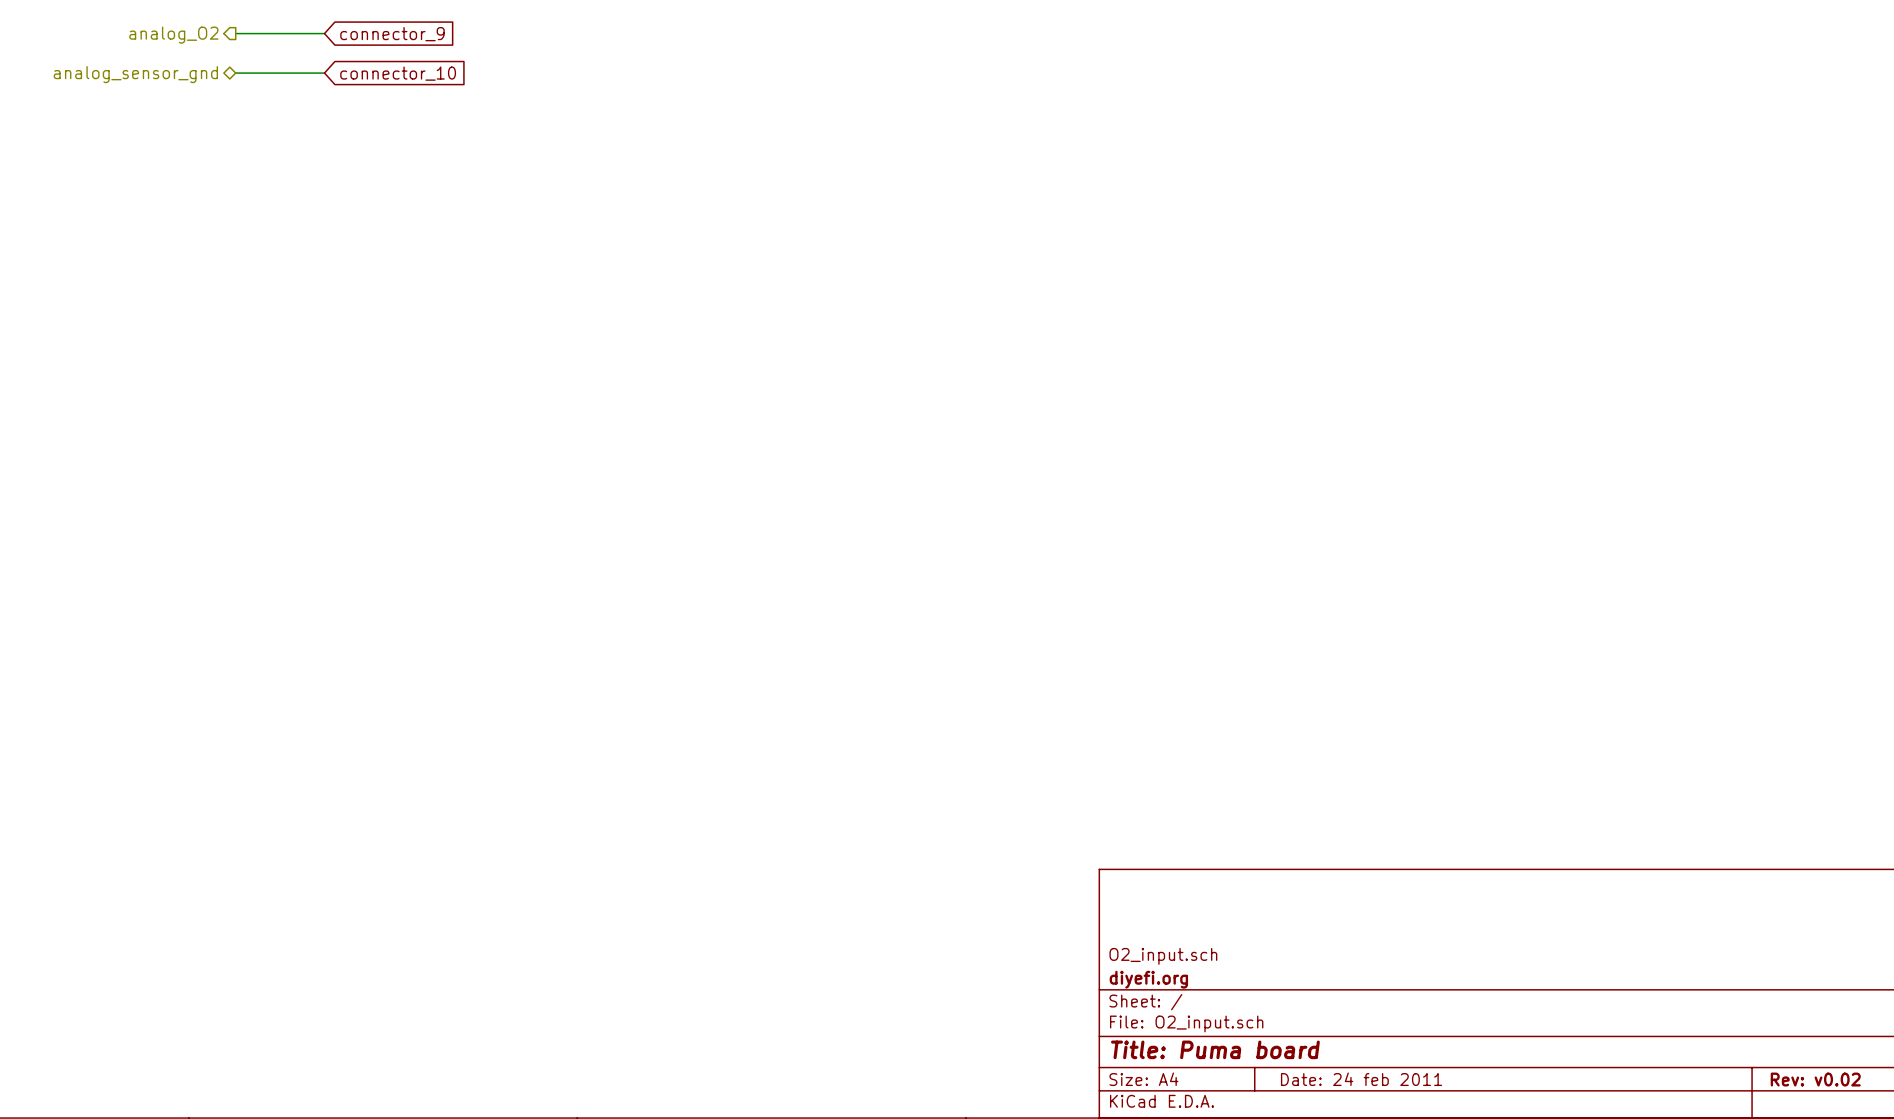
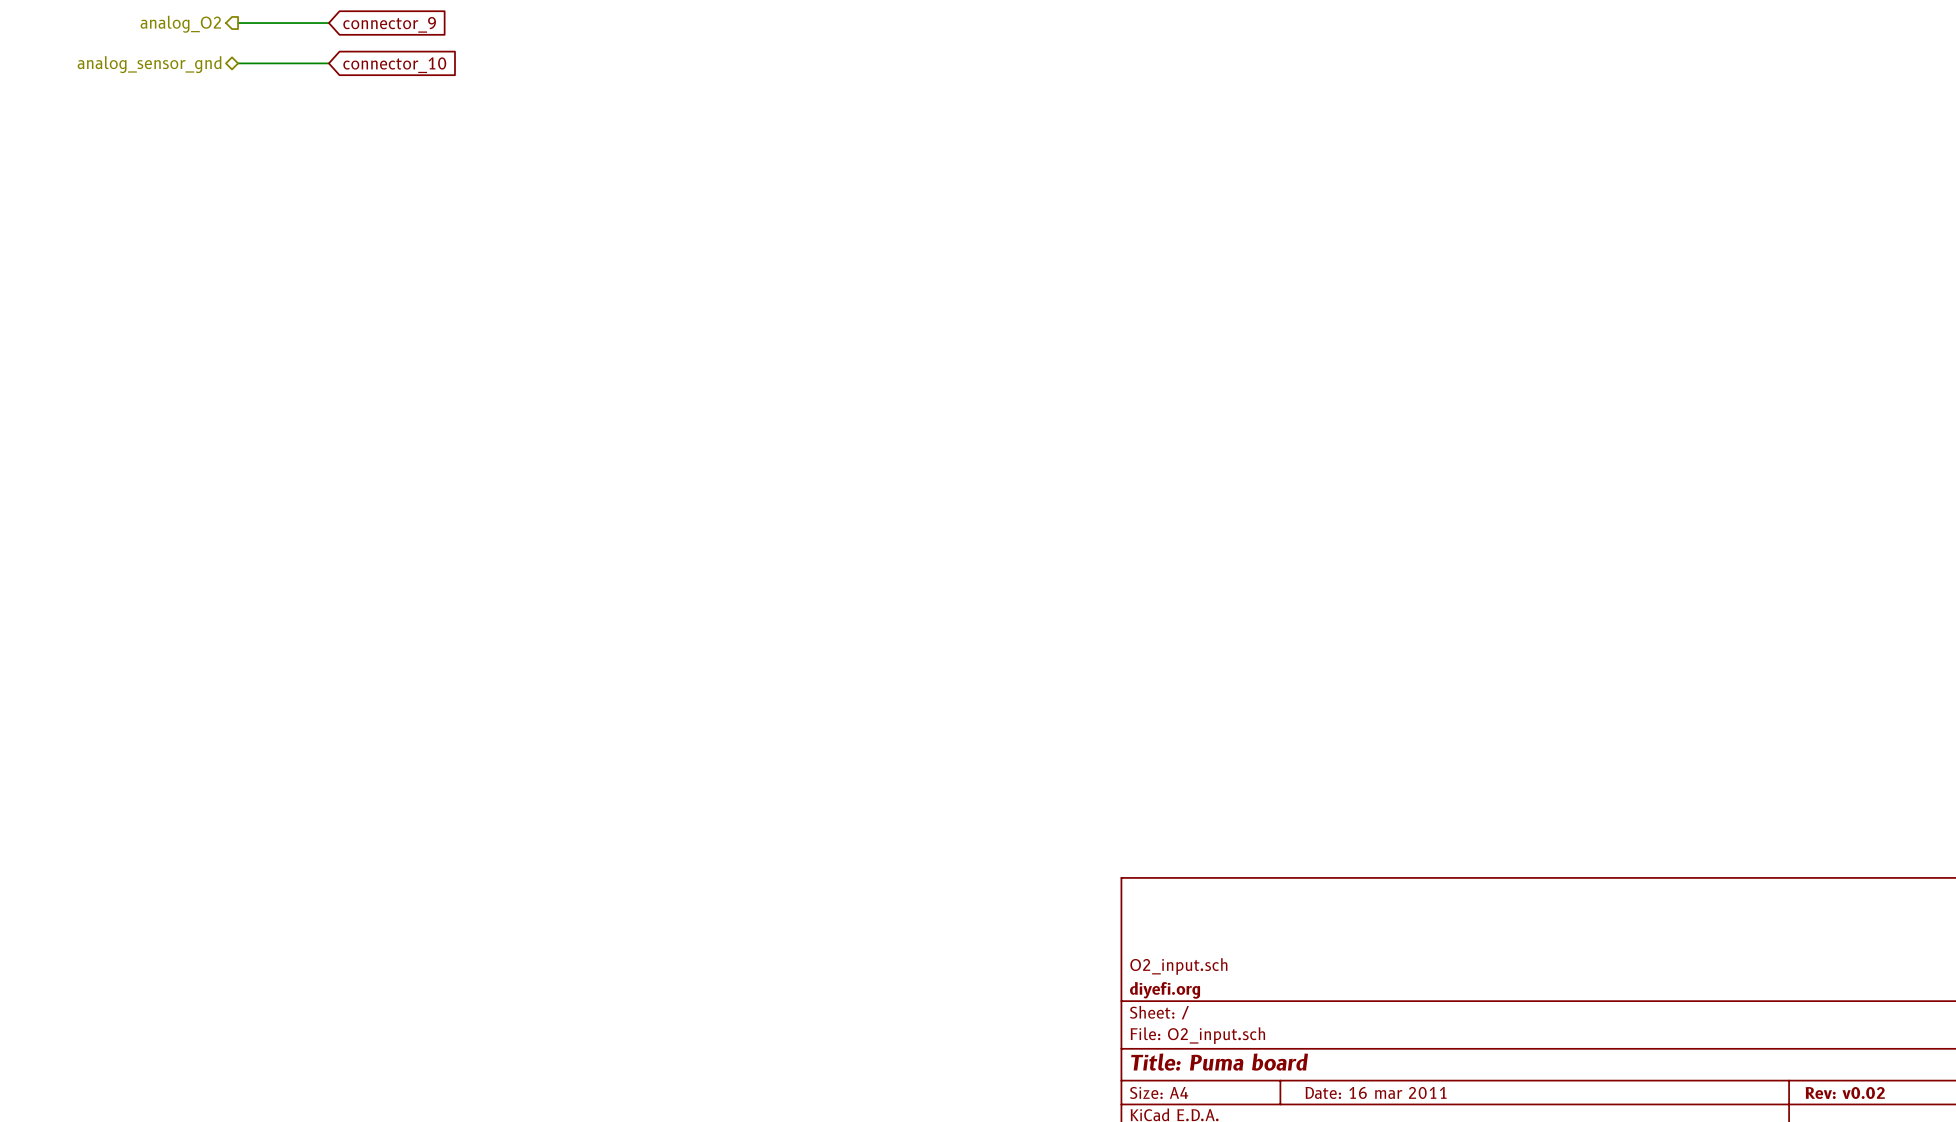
title block: Date: 24 feb 2011 (1361, 1079) -> Date: 16 mar 2011 (1376, 1092)

